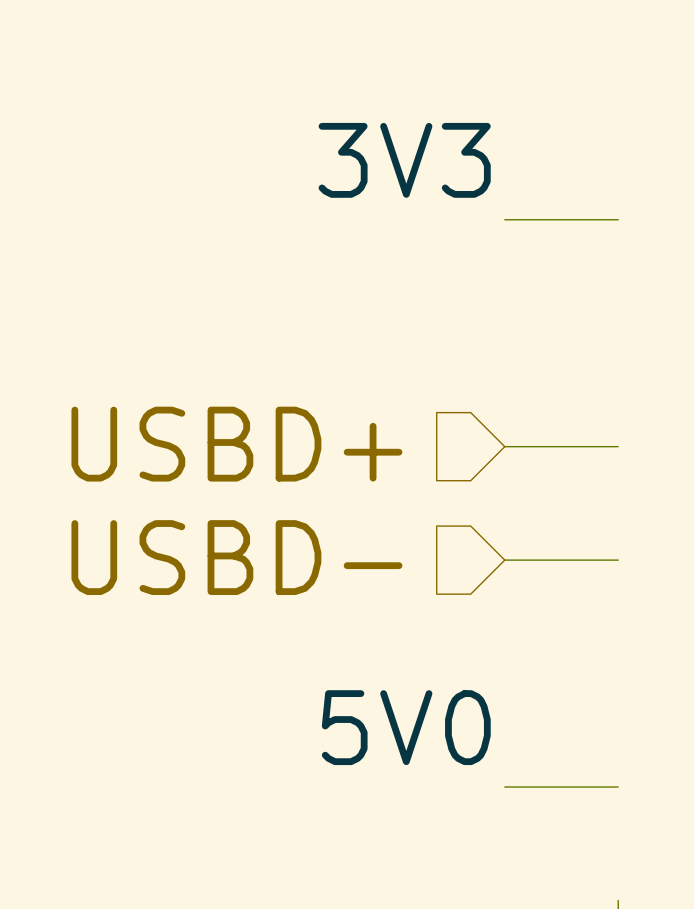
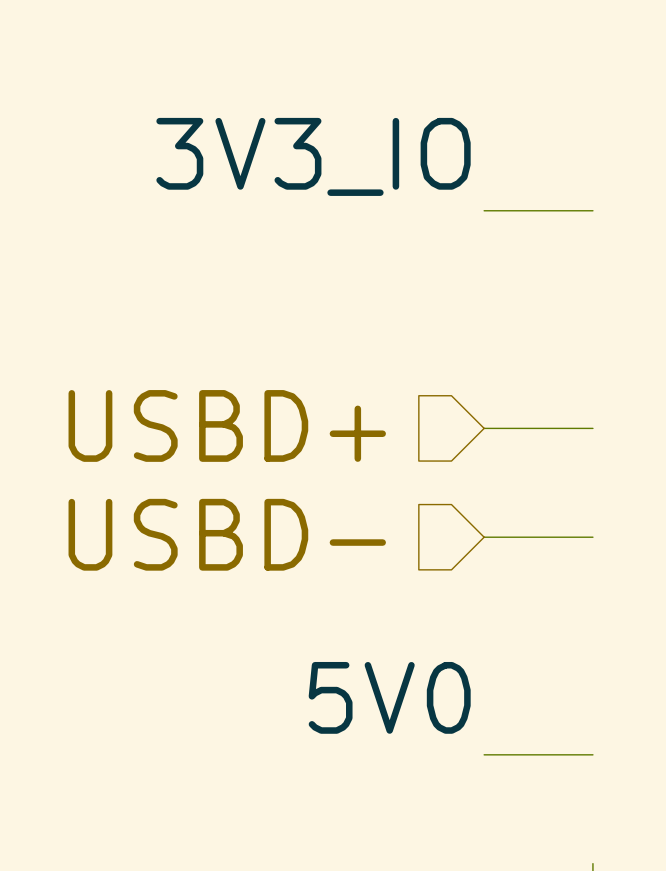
label: 3V3 (404, 160) -> 3V3_IO (313, 156)

